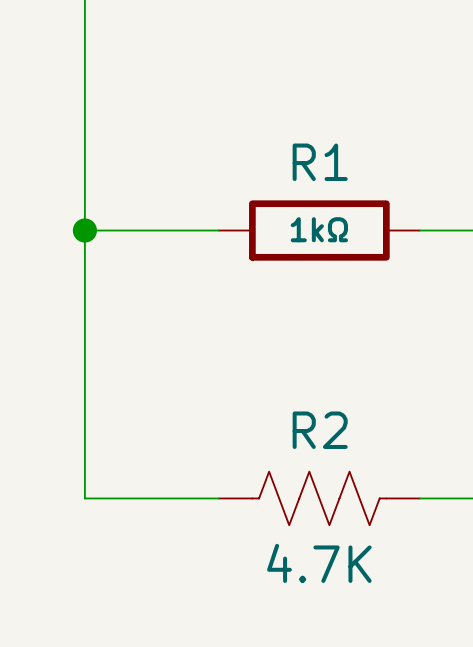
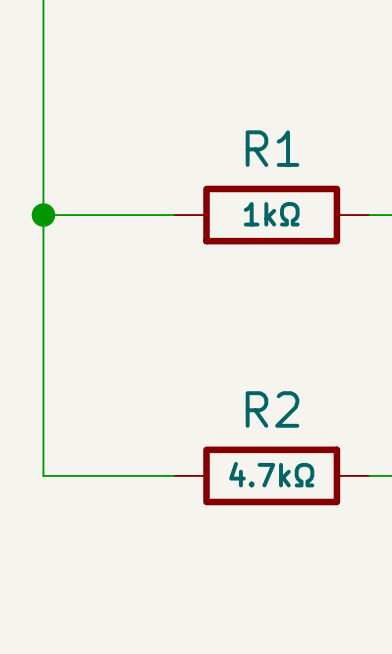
R2 symbol: [218, 471, 420, 526] -> [173, 446, 370, 506]
R2 value: 4.7K (319, 563) -> 4.7kΩ (271, 474)

